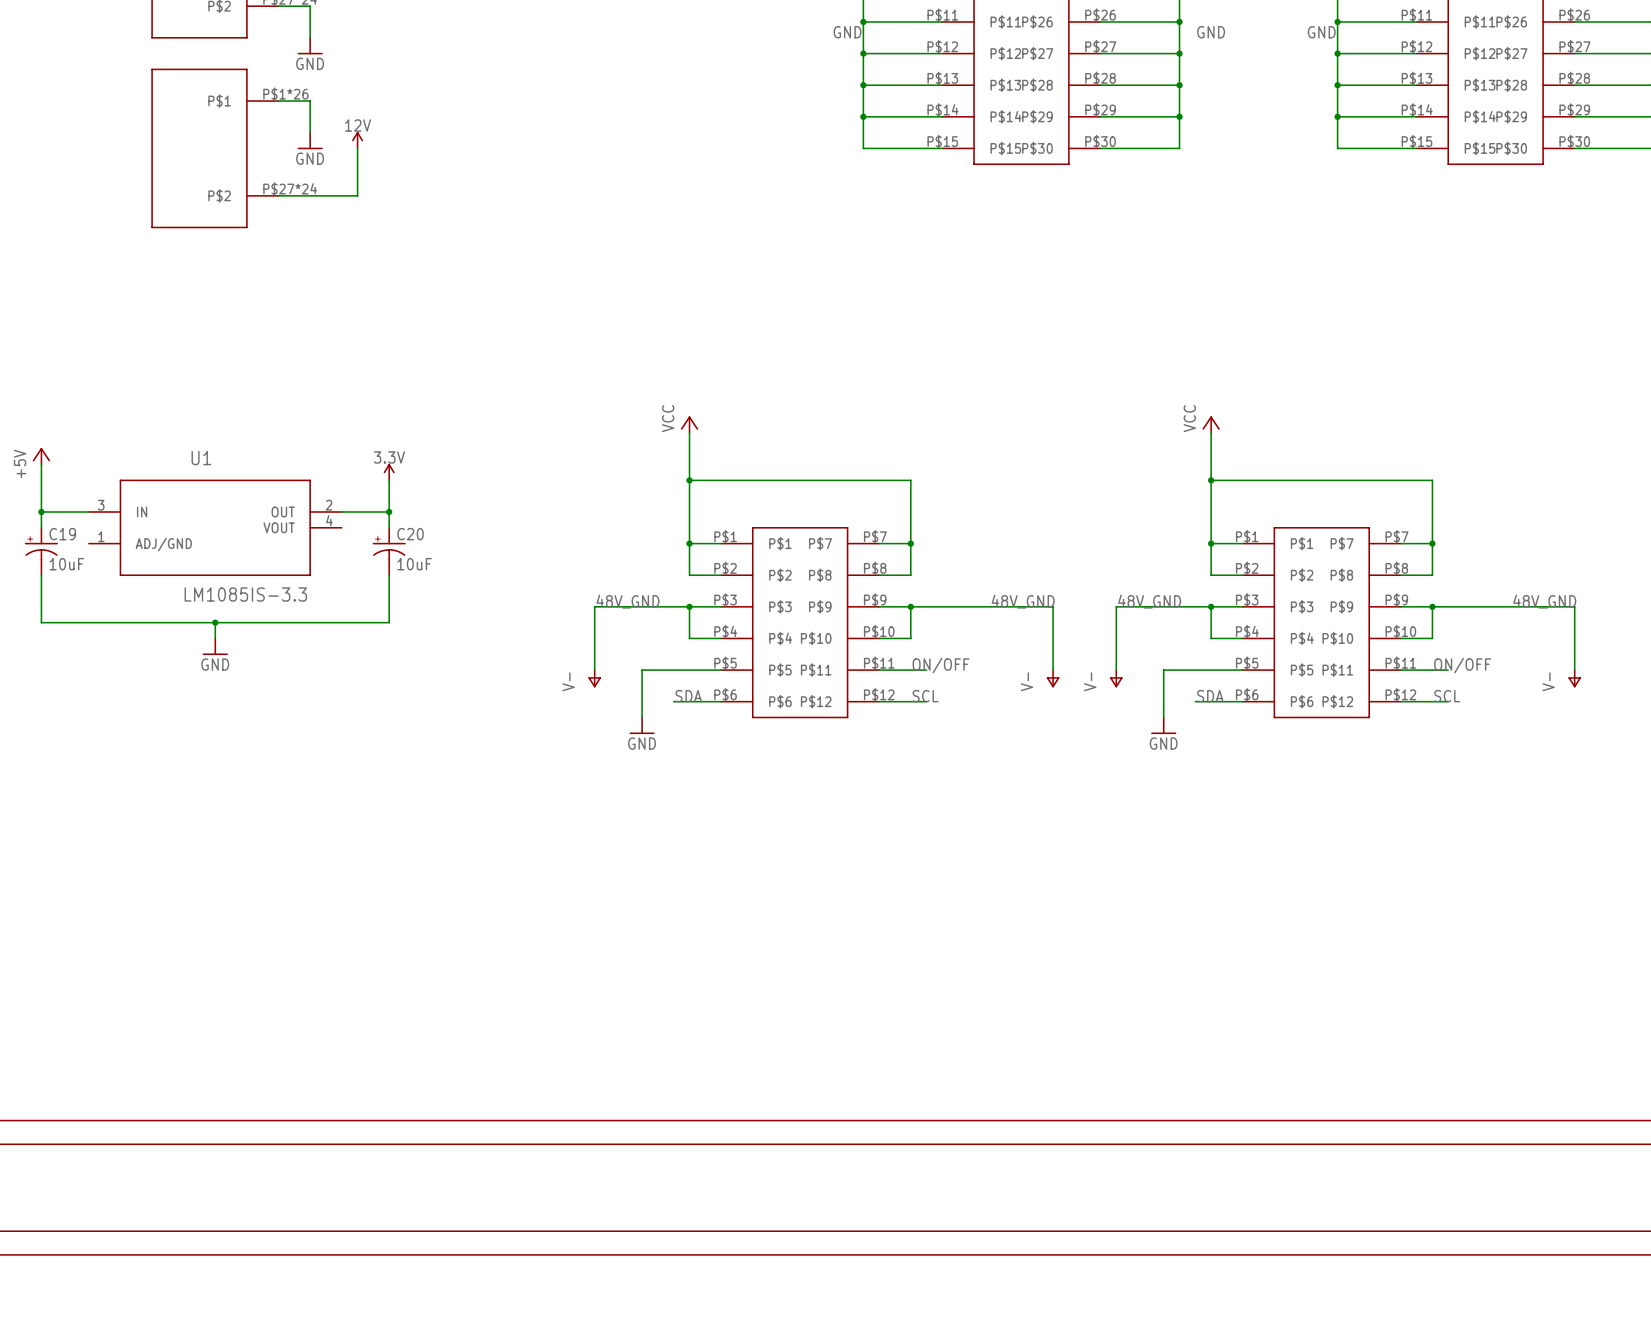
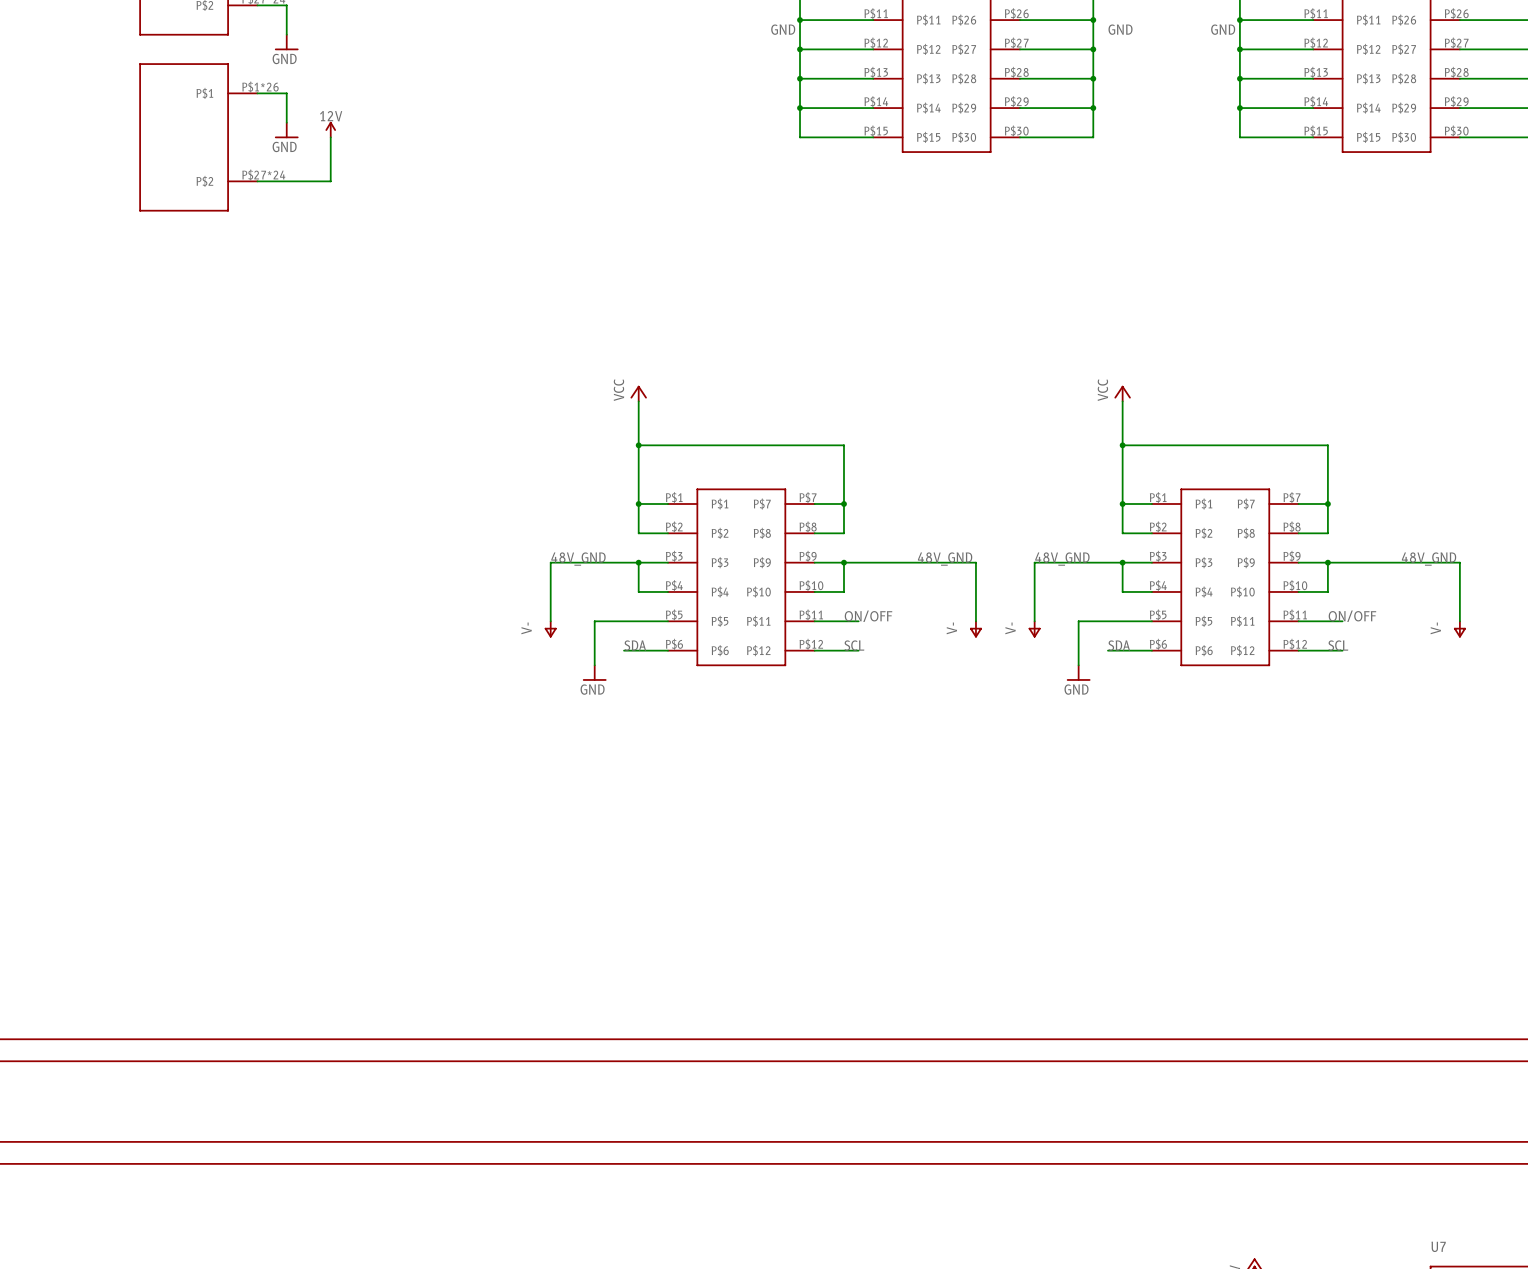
power symbol: +5V (41, 456) -> none
wire: (41, 464) (41, 527) -> none
power symbol: 3.3V (389, 472) -> none
wire: (389, 480) (389, 527) -> none
wire: (41, 512) (88, 512) -> none
junction: (41, 512) -> none
wire: (341, 512) (389, 512) -> none
junction: (389, 512) -> none
U1: LM1085IS-3.3 (215, 527) -> none
C19: 10uF (41, 551) -> none
C20: 10uF (389, 551) -> none
wire: (41, 575) (41, 622) (389, 622) (389, 575) -> none
wire: (215, 622) (215, 638) -> none
junction: (215, 622) -> none
power symbol: GND (215, 646) -> none

